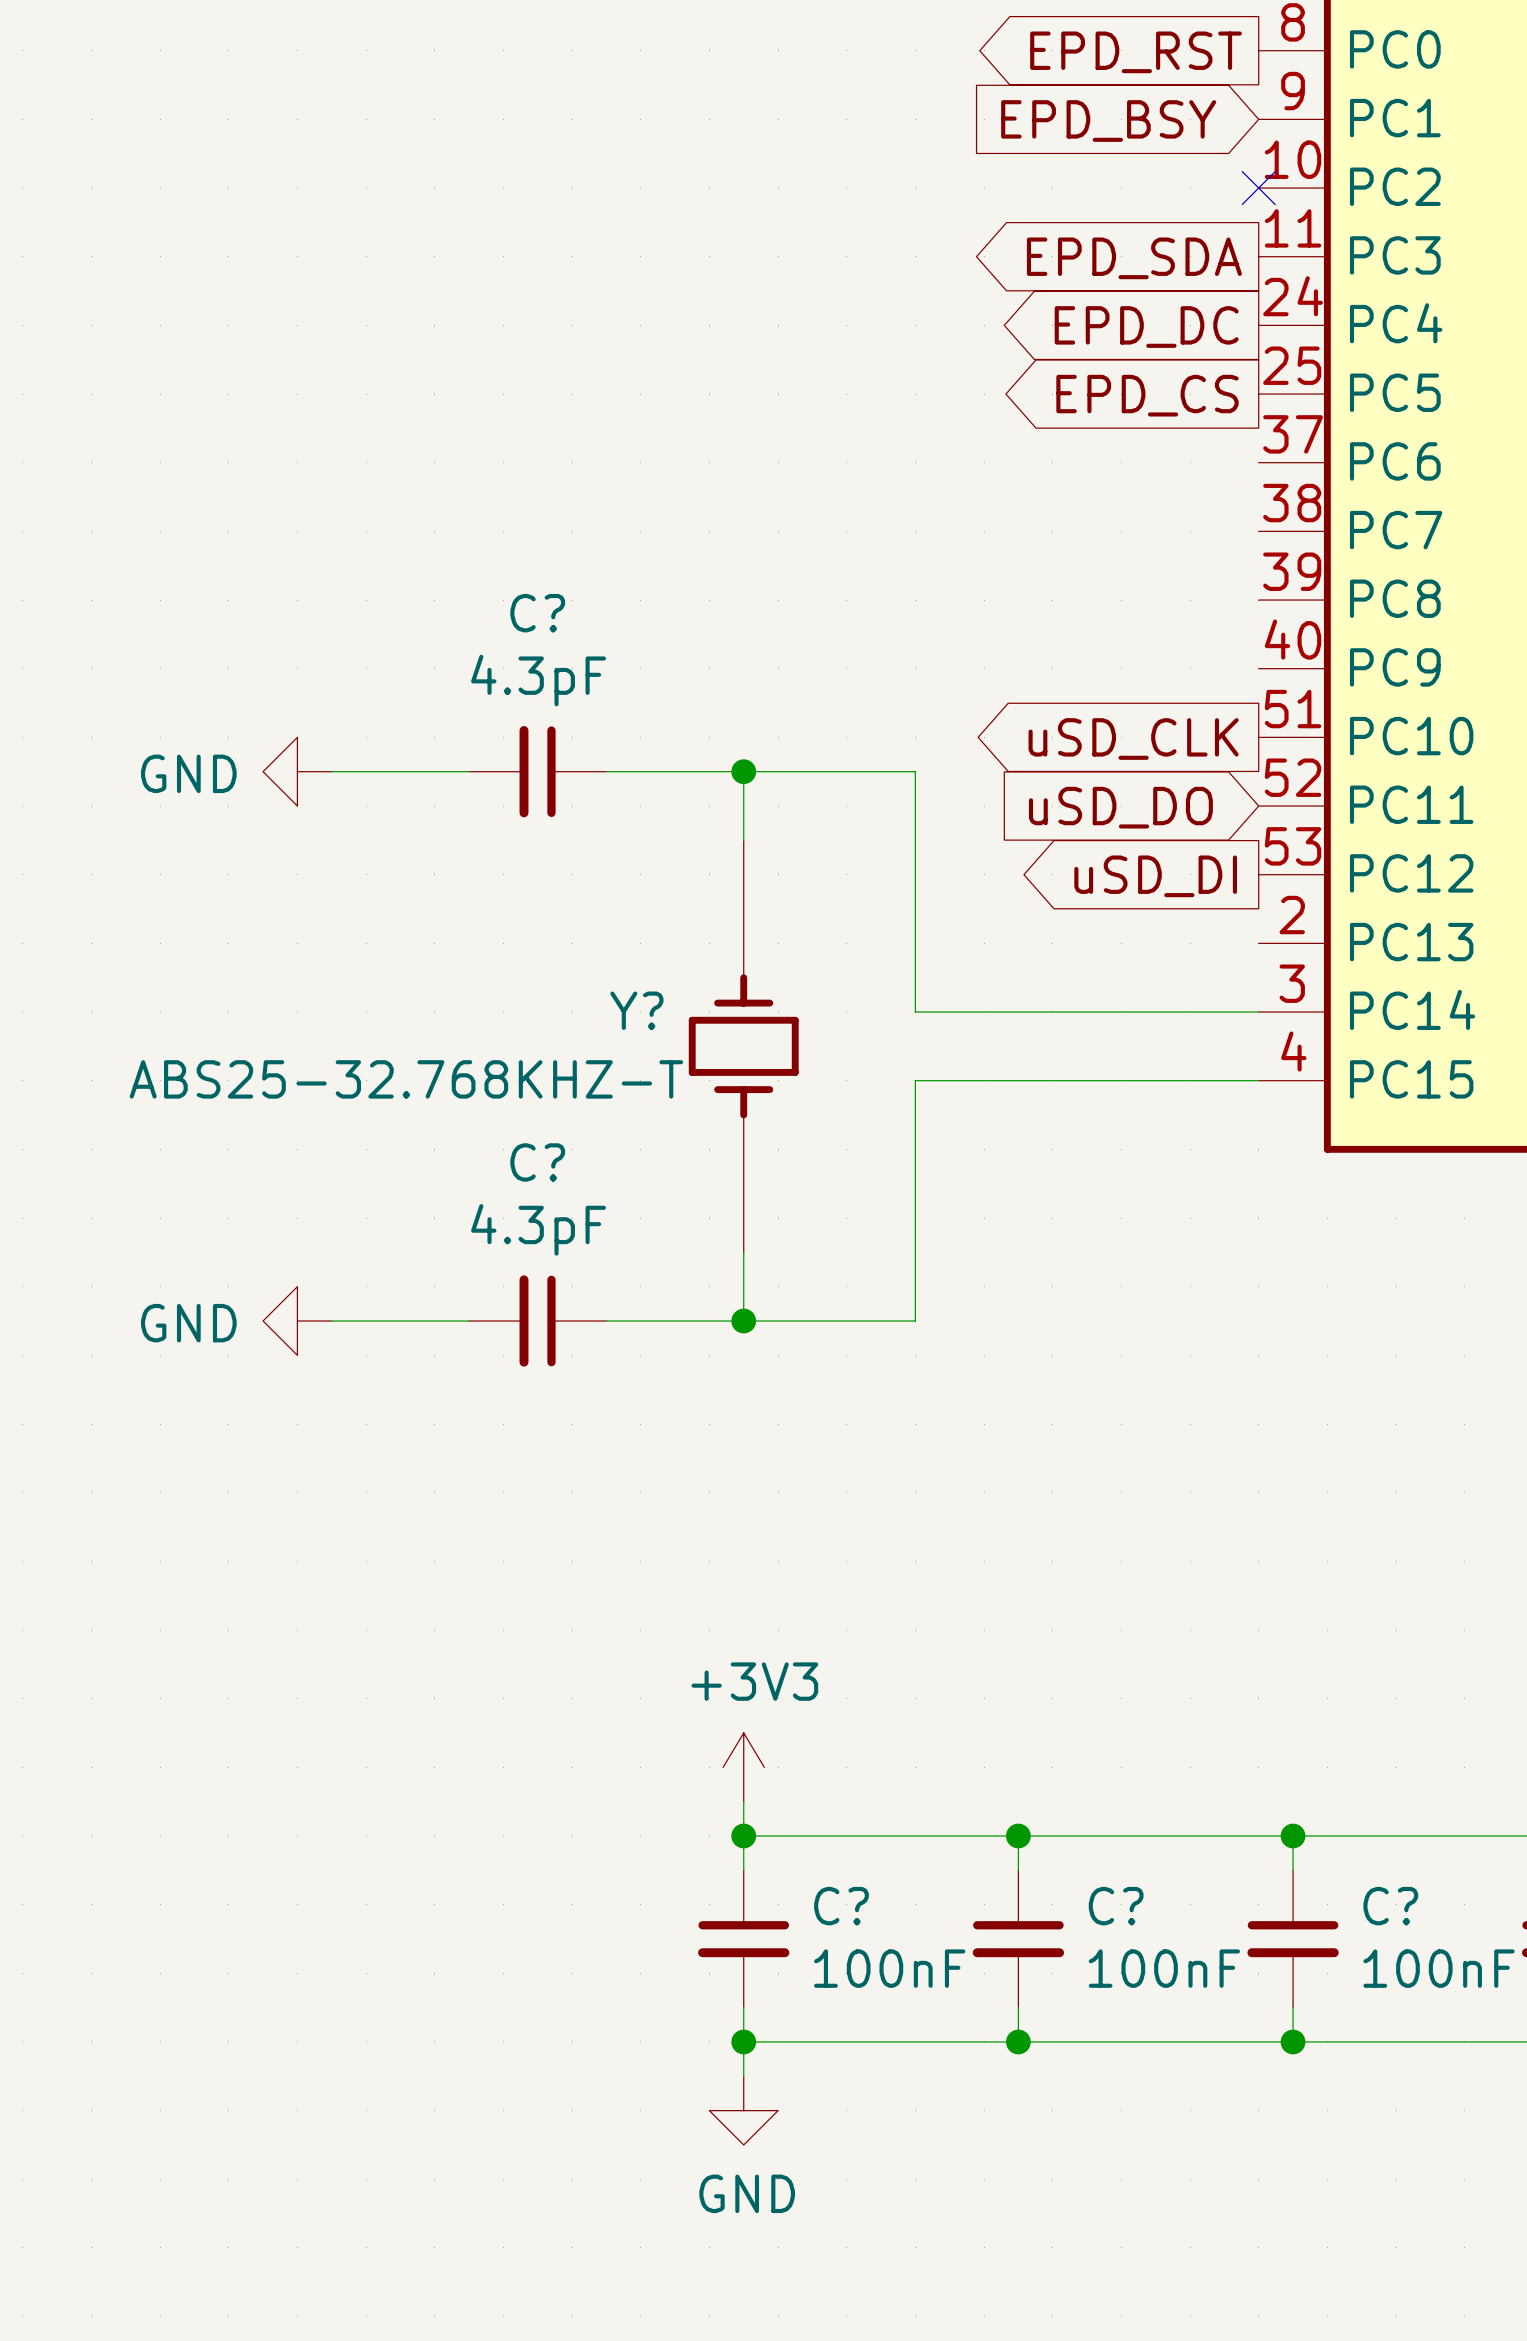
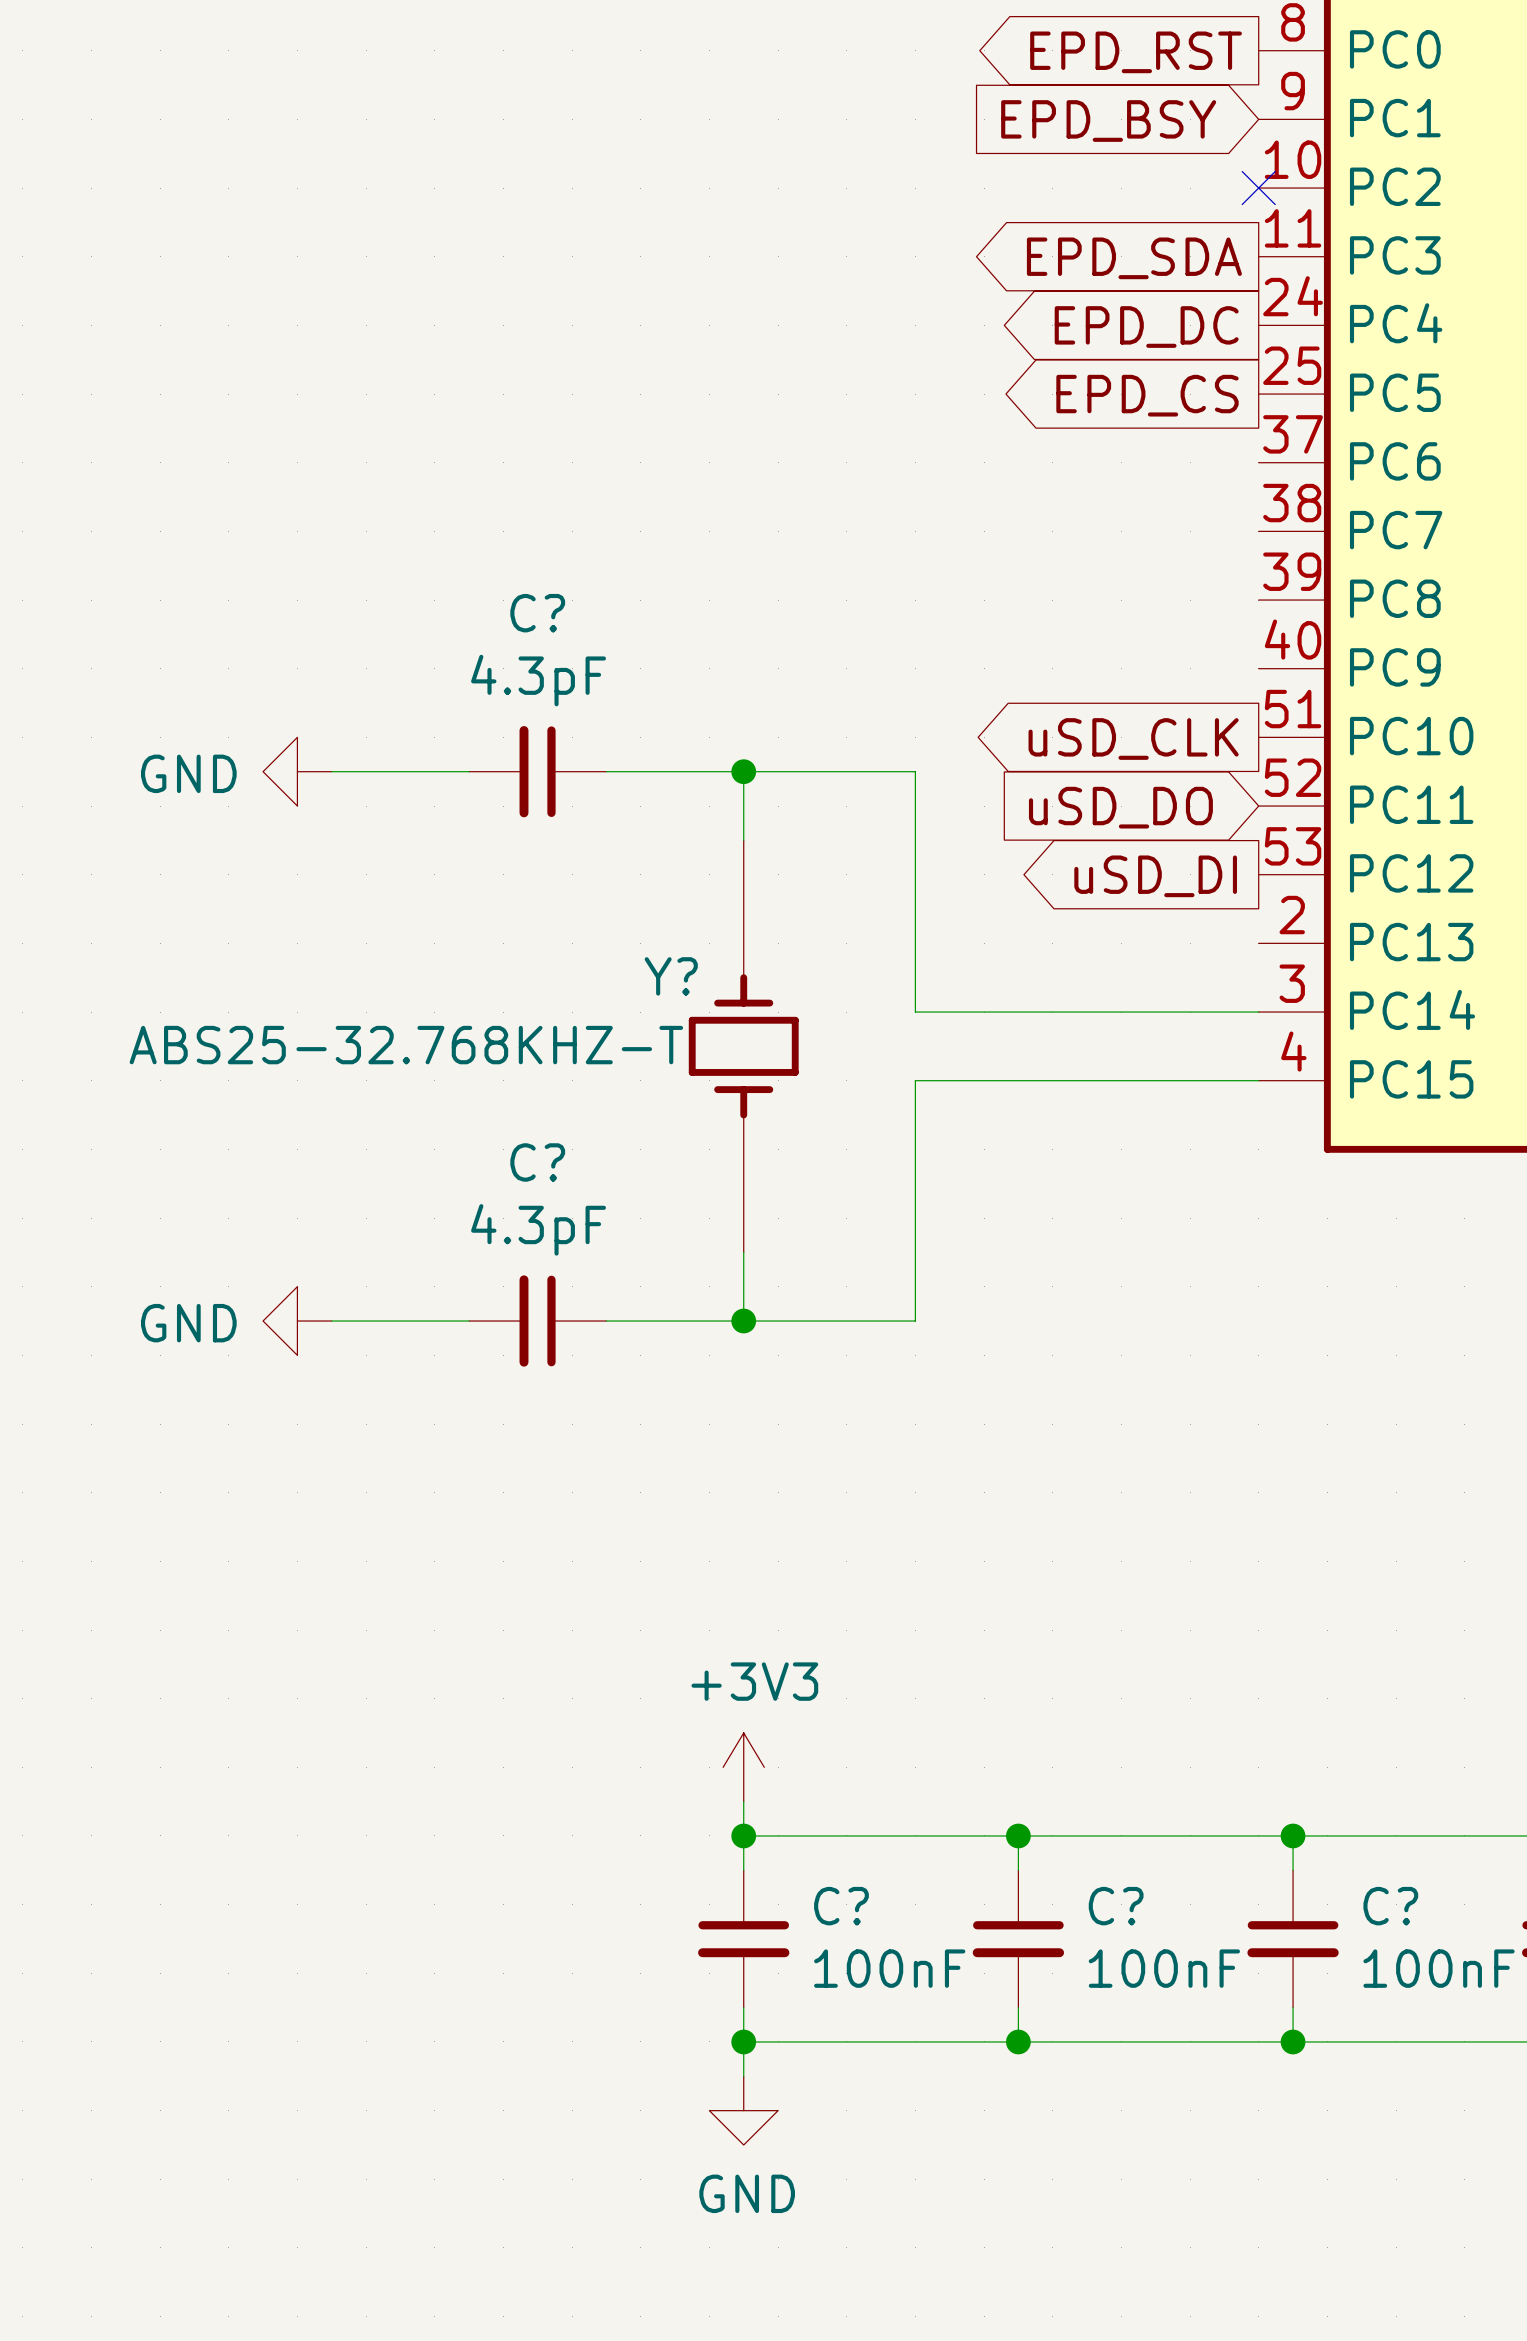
Y? name position: Y? (636, 1010) -> Y? (671, 976)
Y? value position: ABS25-32.768KHZ-T (406, 1079) -> ABS25-32.768KHZ-T (406, 1045)

